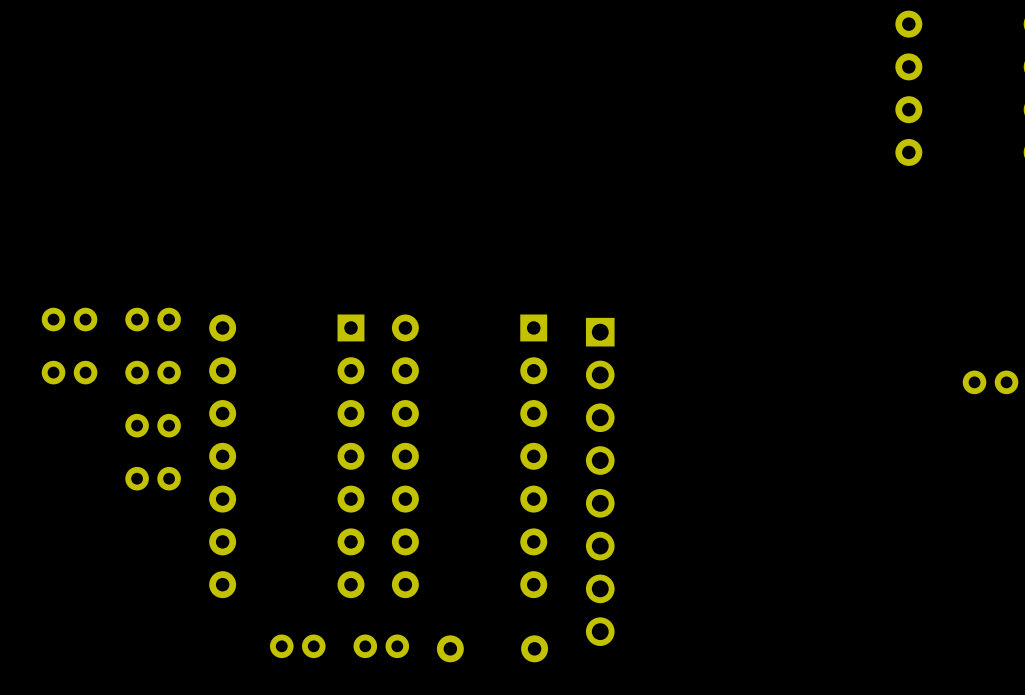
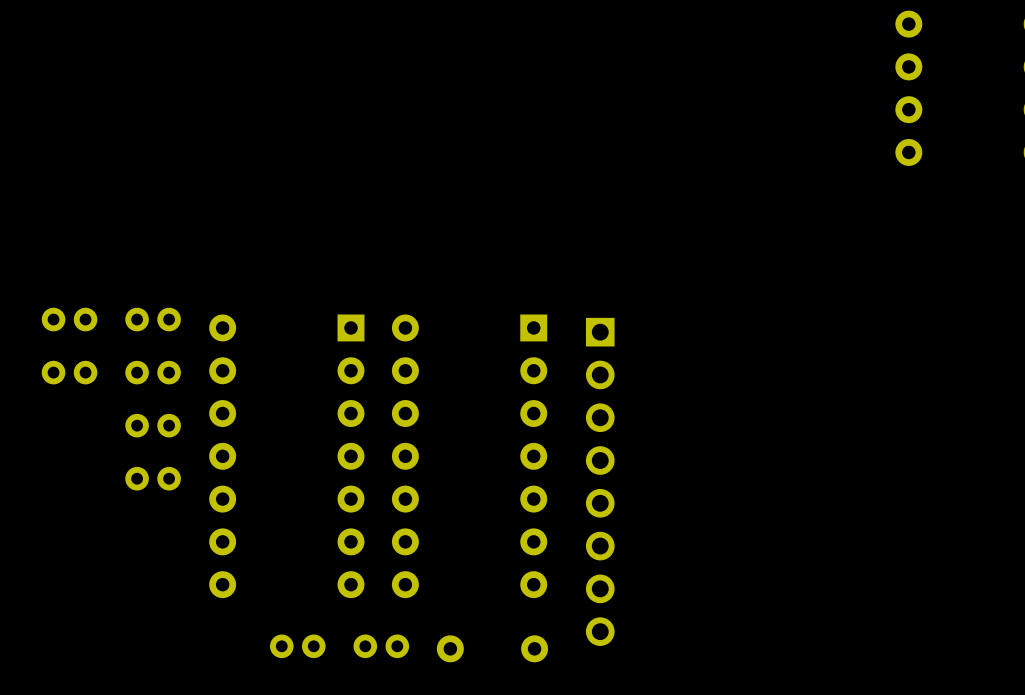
part: (990, 382) -> none

